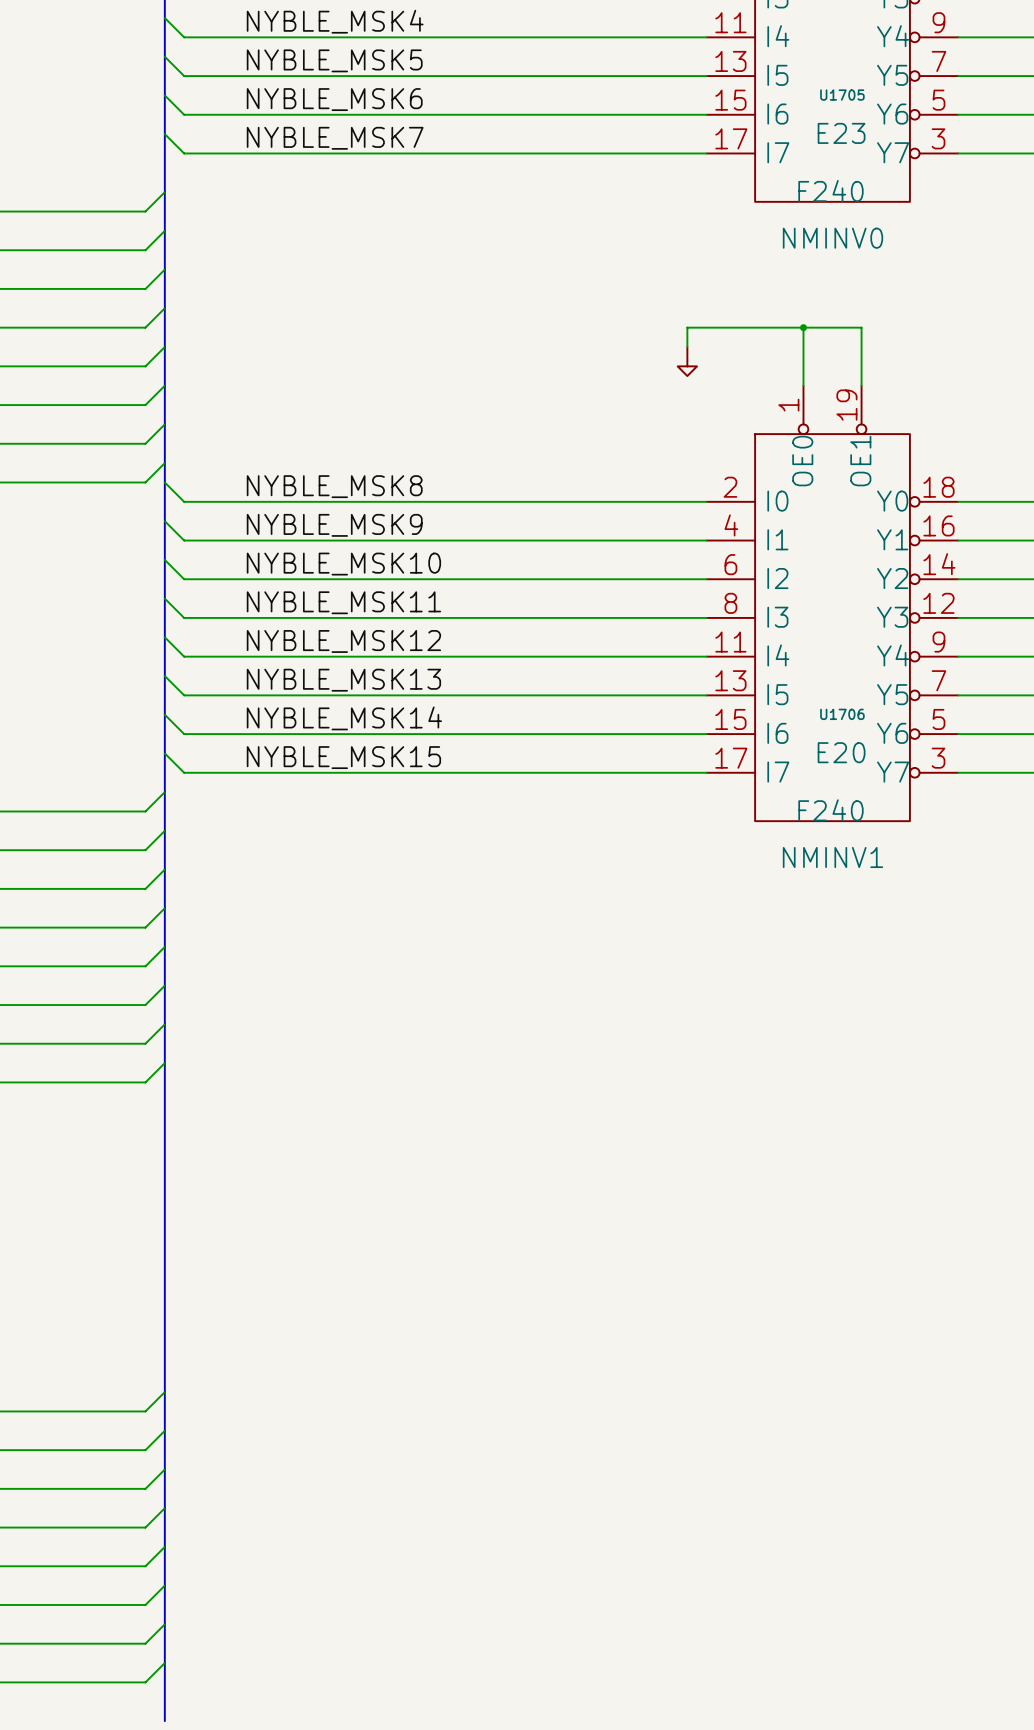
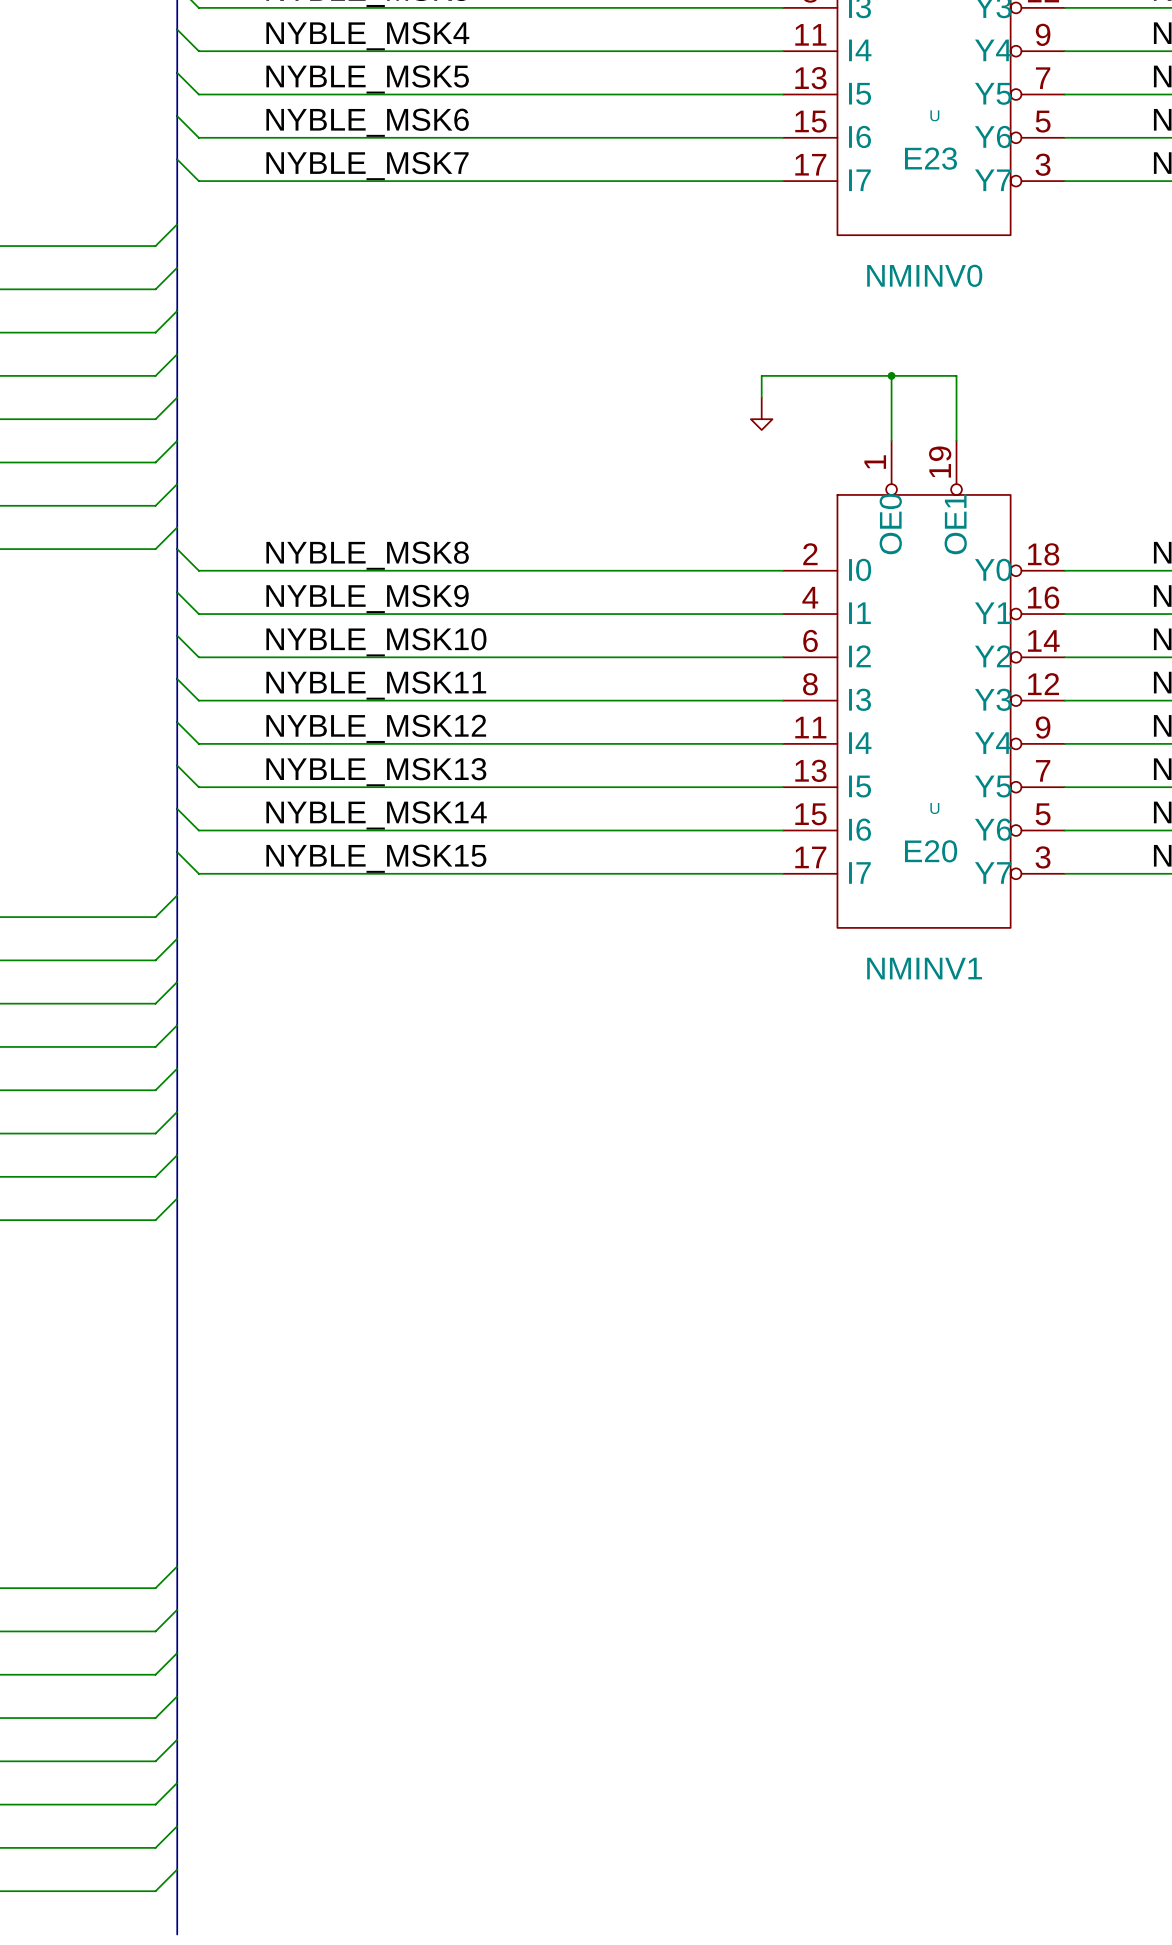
U1705 name: U1705 (842, 95) -> U (934, 115)
U1705 value: F240 (830, 190) -> none
U1706 name: U1706 (842, 714) -> U (934, 808)
U1706 value: F240 (830, 810) -> none

